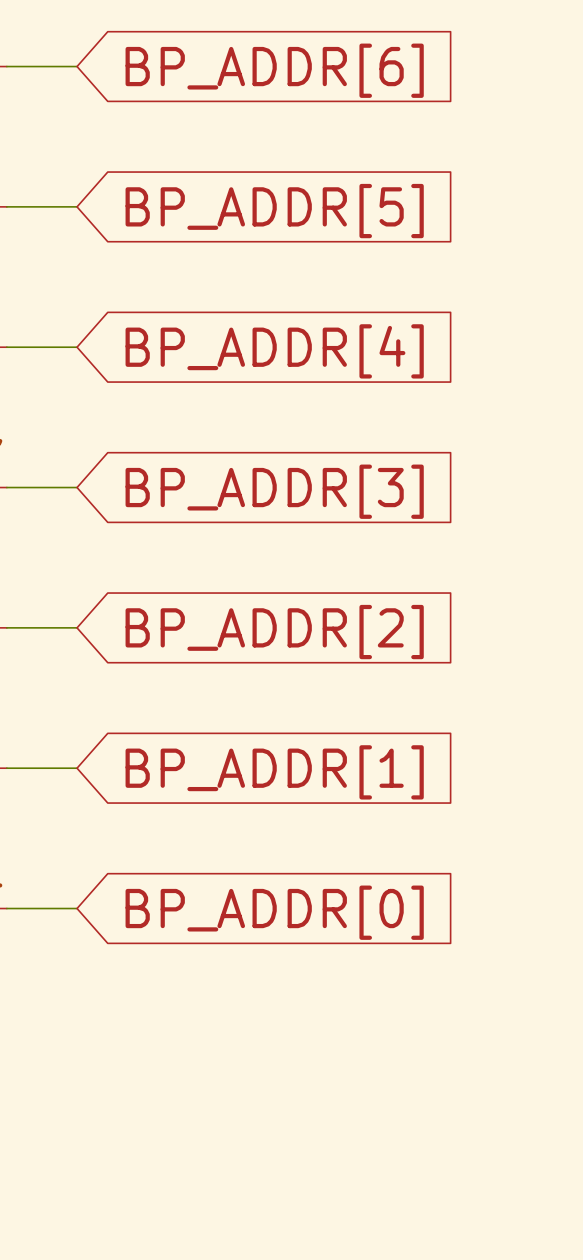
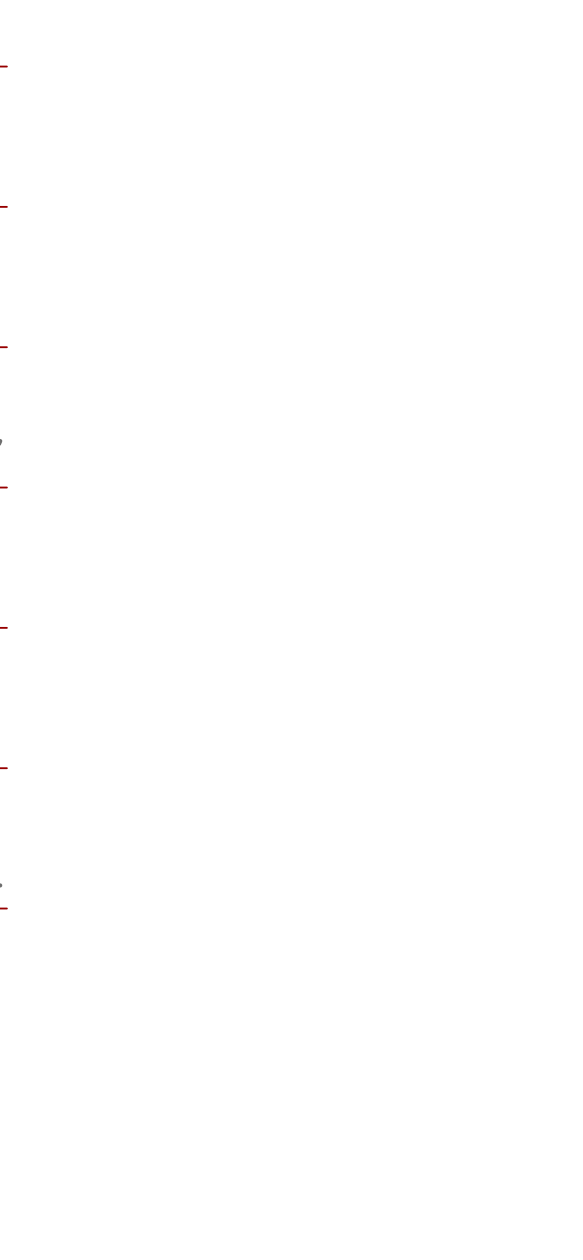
wire: (6, 66) (77, 66) -> none
global label: BP_ADDR[6] (274, 70) -> none
wire: (6, 206) (77, 206) -> none
global label: BP_ADDR[5] (274, 211) -> none
wire: (6, 347) (77, 347) -> none
global label: BP_ADDR[4] (274, 351) -> none
wire: (6, 487) (77, 487) -> none
global label: BP_ADDR[3] (274, 491) -> none
wire: (6, 627) (77, 627) -> none
global label: BP_ADDR[2] (274, 632) -> none
wire: (6, 768) (77, 768) -> none
global label: BP_ADDR[1] (274, 772) -> none
wire: (6, 908) (77, 908) -> none
global label: BP_ADDR[0] (274, 912) -> none

